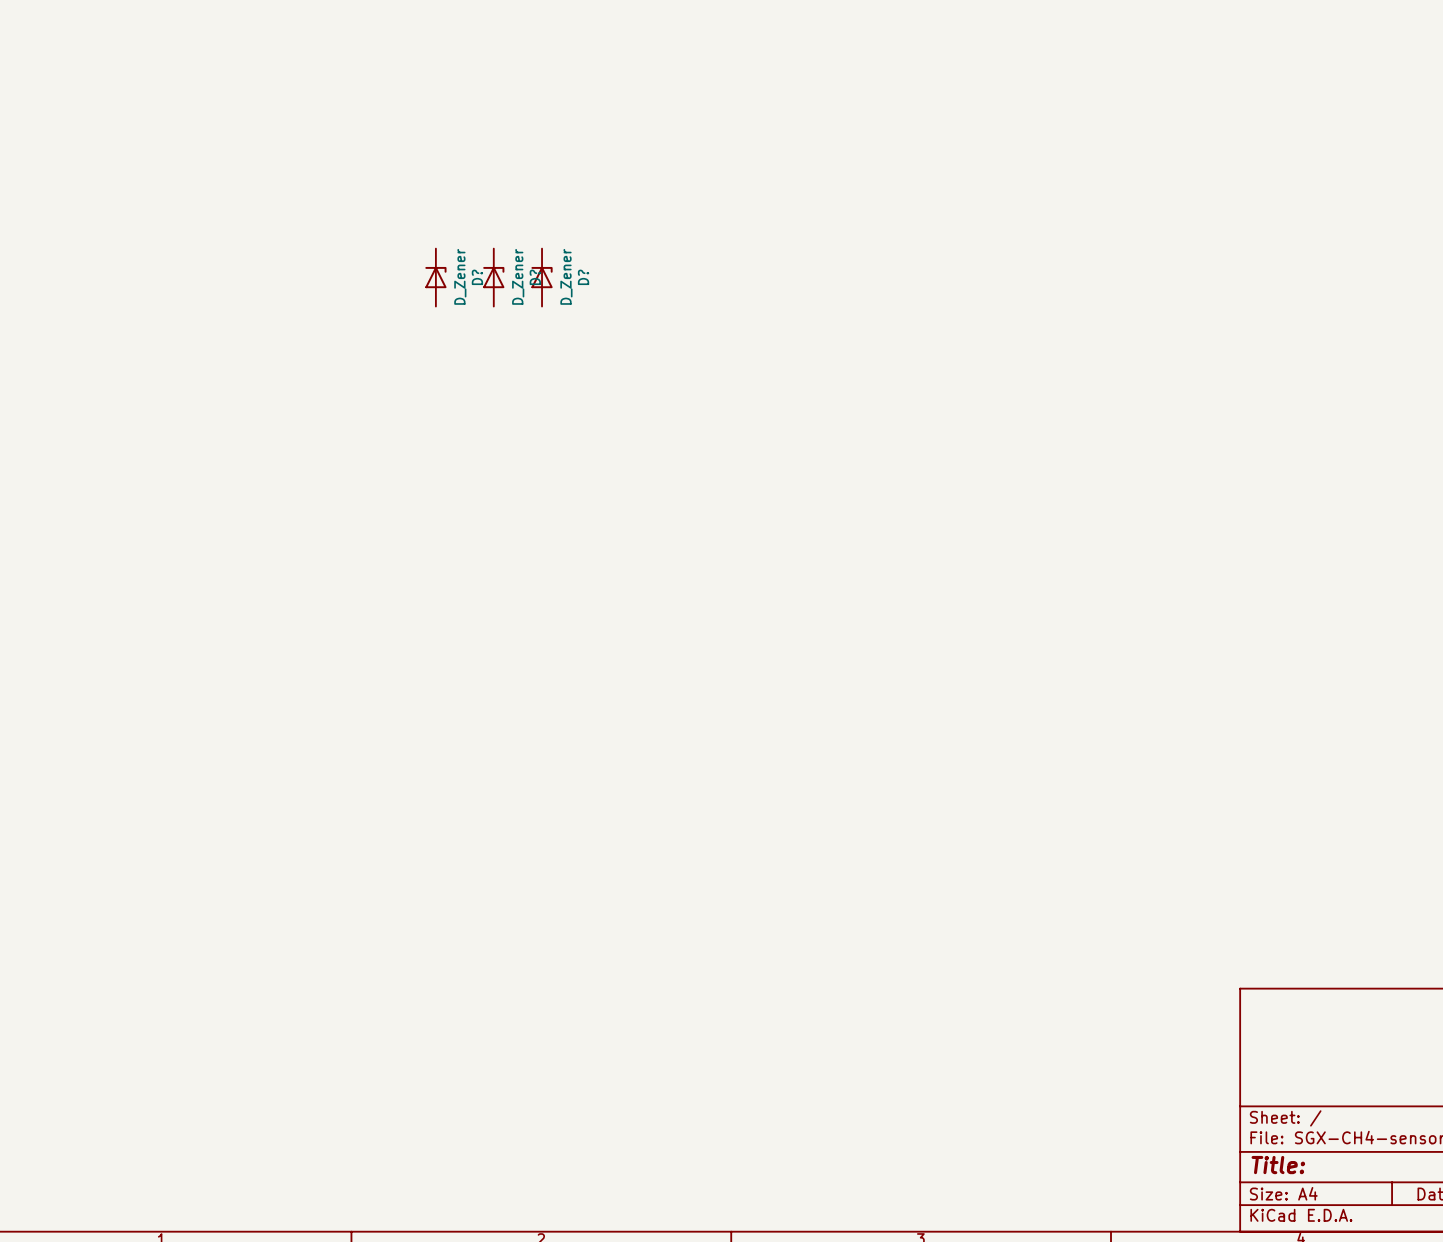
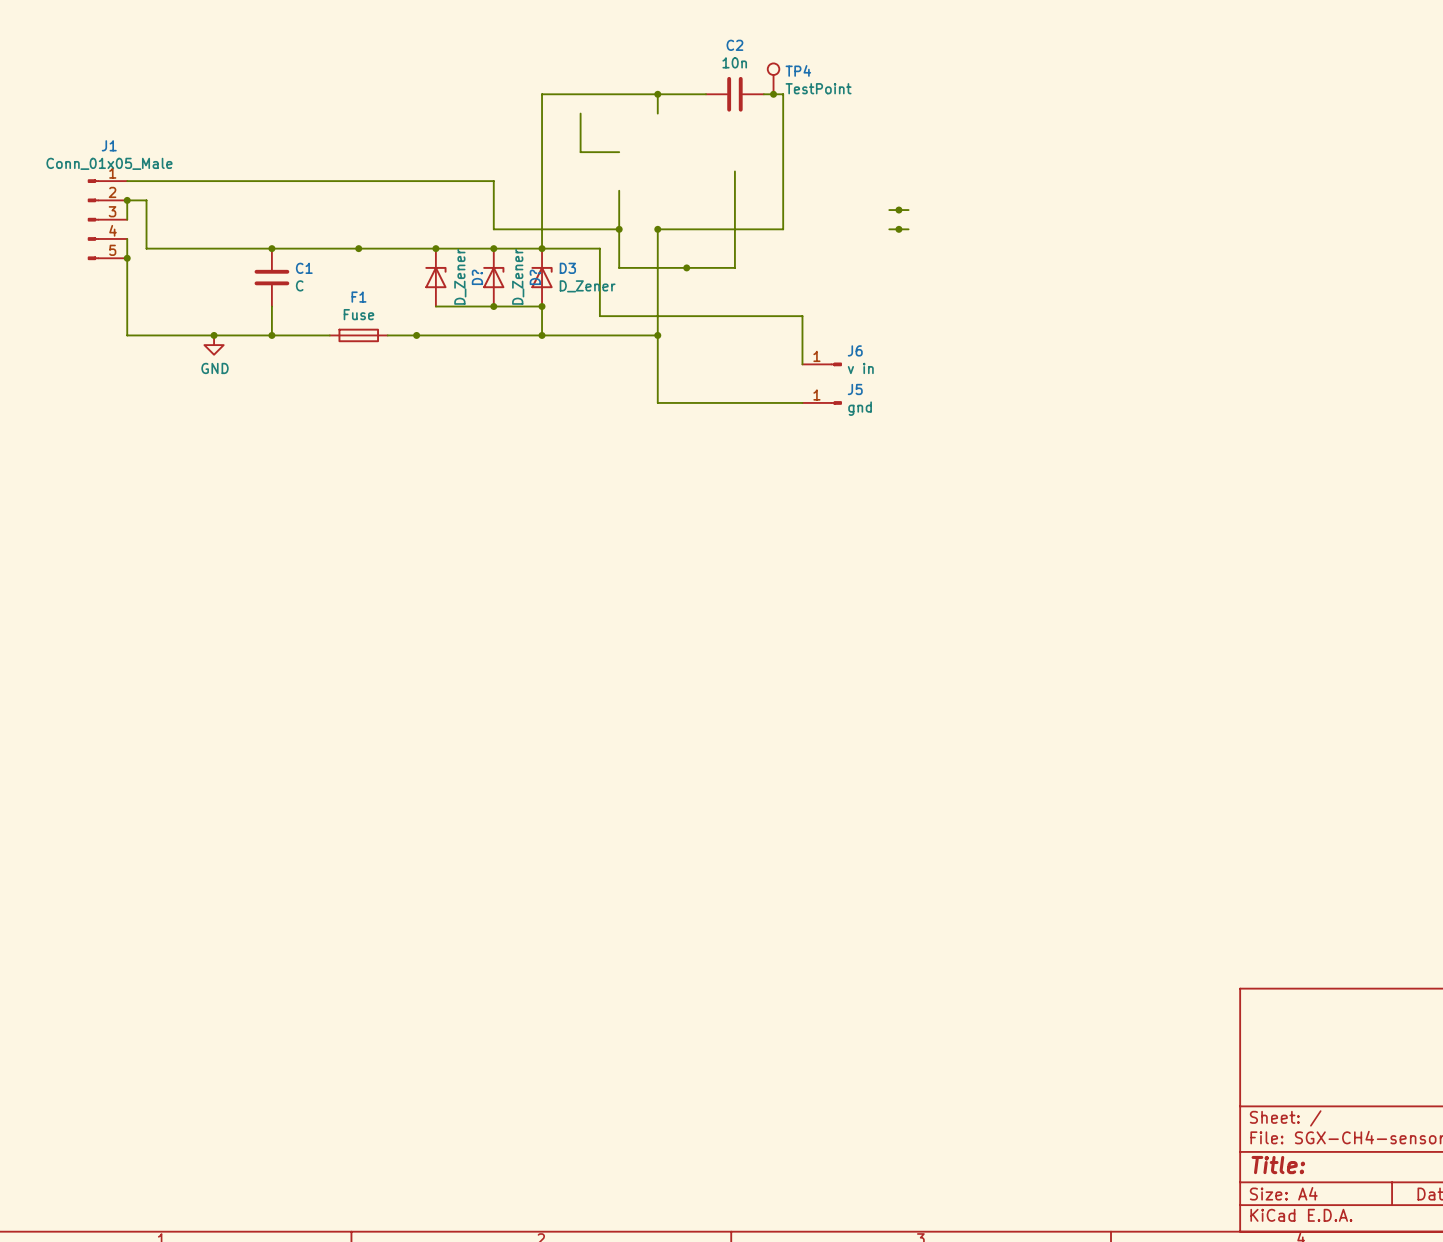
TP4: none -> TestPoint (773, 78)
wire: none -> (657, 94) (657, 113)
junction: none -> (657, 94)
wire: none -> (706, 94) (542, 94) (542, 248)
C2: none -> 10n (734, 94)
wire: none -> (763, 94) (783, 94) (783, 229) (657, 229) (657, 402) (802, 402)
junction: none -> (773, 94)
wire: none -> (580, 113) (580, 152) (619, 152)
wire: none -> (734, 171) (734, 267) (619, 267) (619, 190)
wire: none -> (127, 181) (493, 181) (493, 229) (619, 229)
junction: none -> (127, 200)
wire: none -> (889, 210) (908, 210)
junction: none -> (898, 210)
J1: none -> Conn_01x05_Male (107, 219)
wire: none -> (127, 219) (127, 200) (146, 200) (146, 248) (599, 248) (599, 316) (802, 316) (802, 364)
junction: none -> (619, 229)
junction: none -> (657, 229)
wire: none -> (889, 229) (908, 229)
junction: none -> (898, 229)
wire: none -> (127, 238) (127, 335) (329, 335)
junction: none -> (271, 248)
junction: none -> (358, 248)
junction: none -> (435, 248)
junction: none -> (493, 248)
junction: none -> (542, 248)
junction: none -> (127, 258)
junction: none -> (686, 267)
D? value rotation: 0° (566, 276) -> 90° clockwise (587, 286)
C1: none -> C (271, 277)
D? name: D? (583, 277) -> D3 (567, 268)
wire: none -> (271, 306) (271, 335)
wire: none -> (435, 306) (542, 306) (542, 335)
junction: none -> (493, 306)
junction: none -> (542, 306)
junction: none -> (214, 335)
junction: none -> (271, 335)
F1: none -> Fuse (358, 335)
wire: none -> (387, 335) (657, 335)
junction: none -> (416, 335)
junction: none -> (542, 335)
junction: none -> (657, 335)
power symbol: none -> GND (214, 345)
J6: none -> v in (822, 364)
J5: none -> gnd (822, 402)

